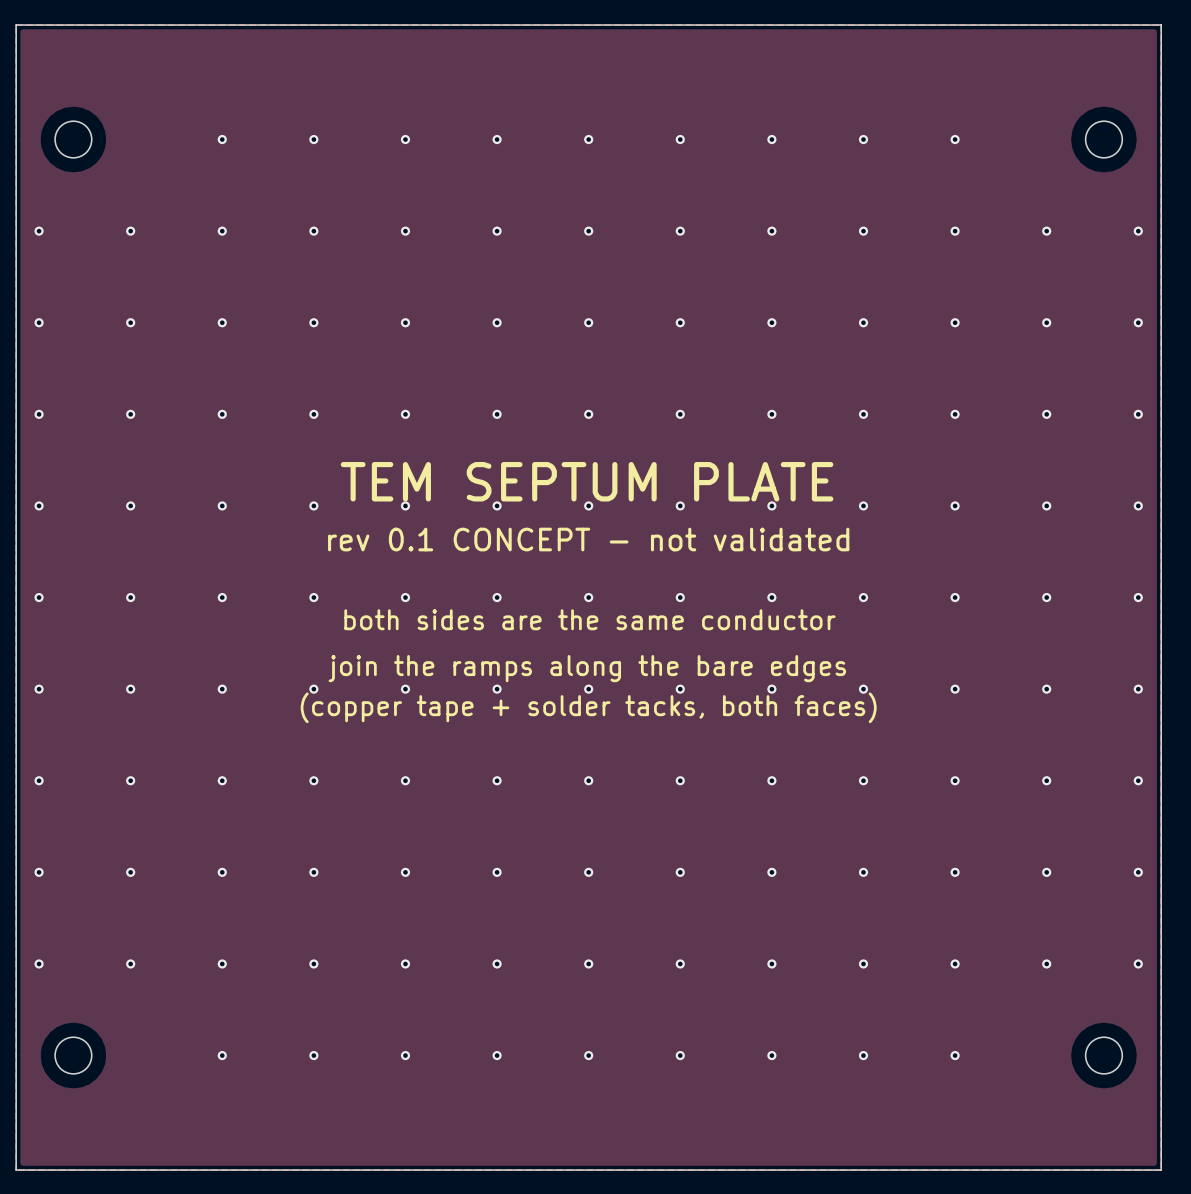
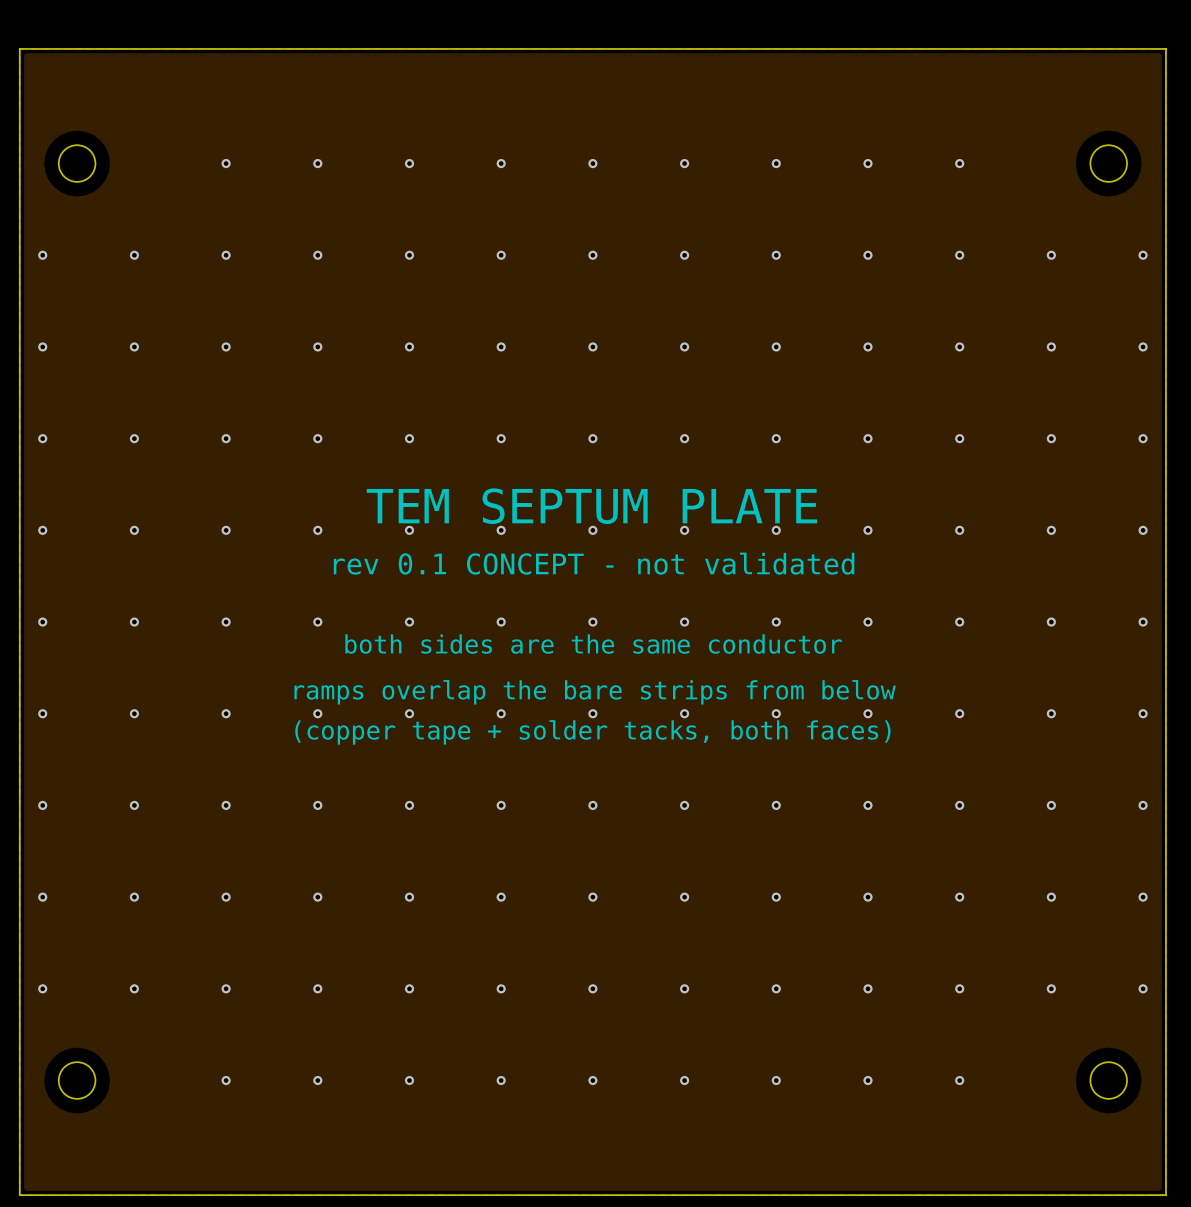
text: join the ramps along the bare edges (587, 668) -> ramps overlap the bare strips from below (595, 692)

